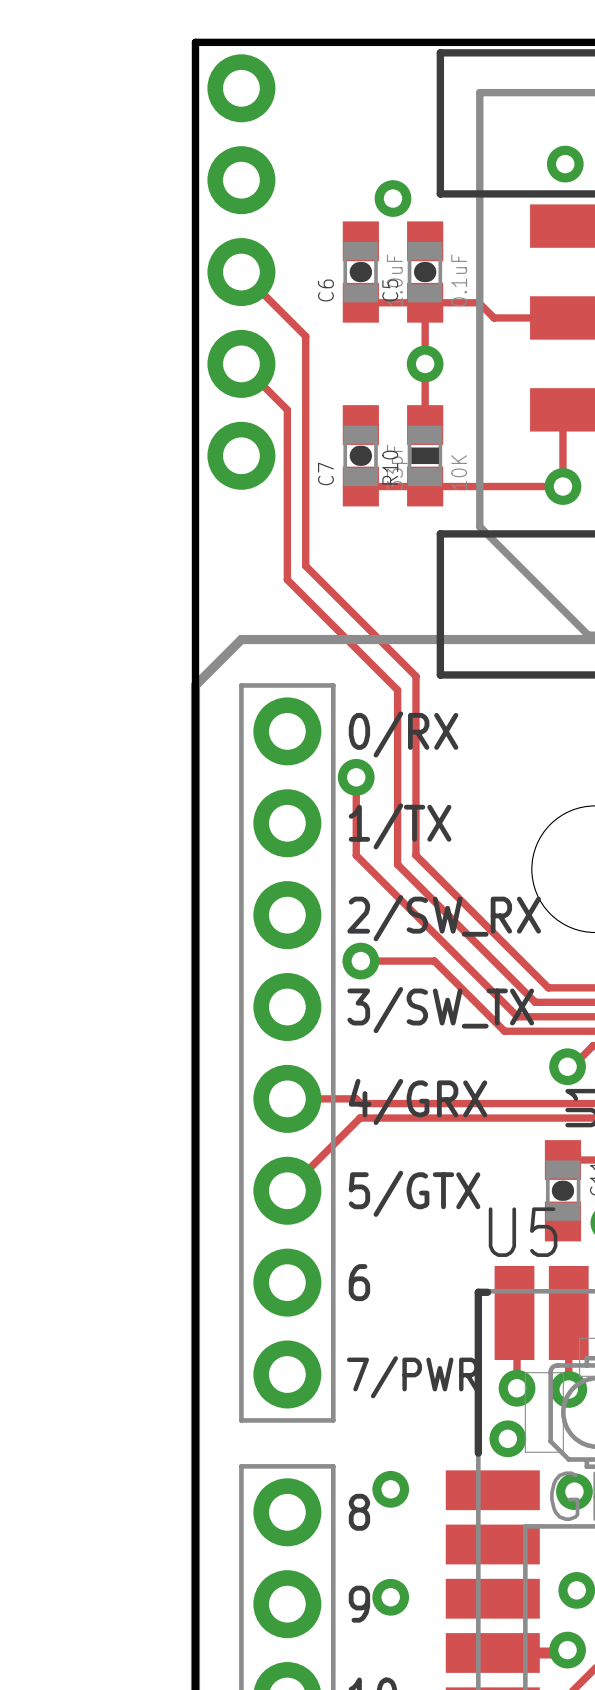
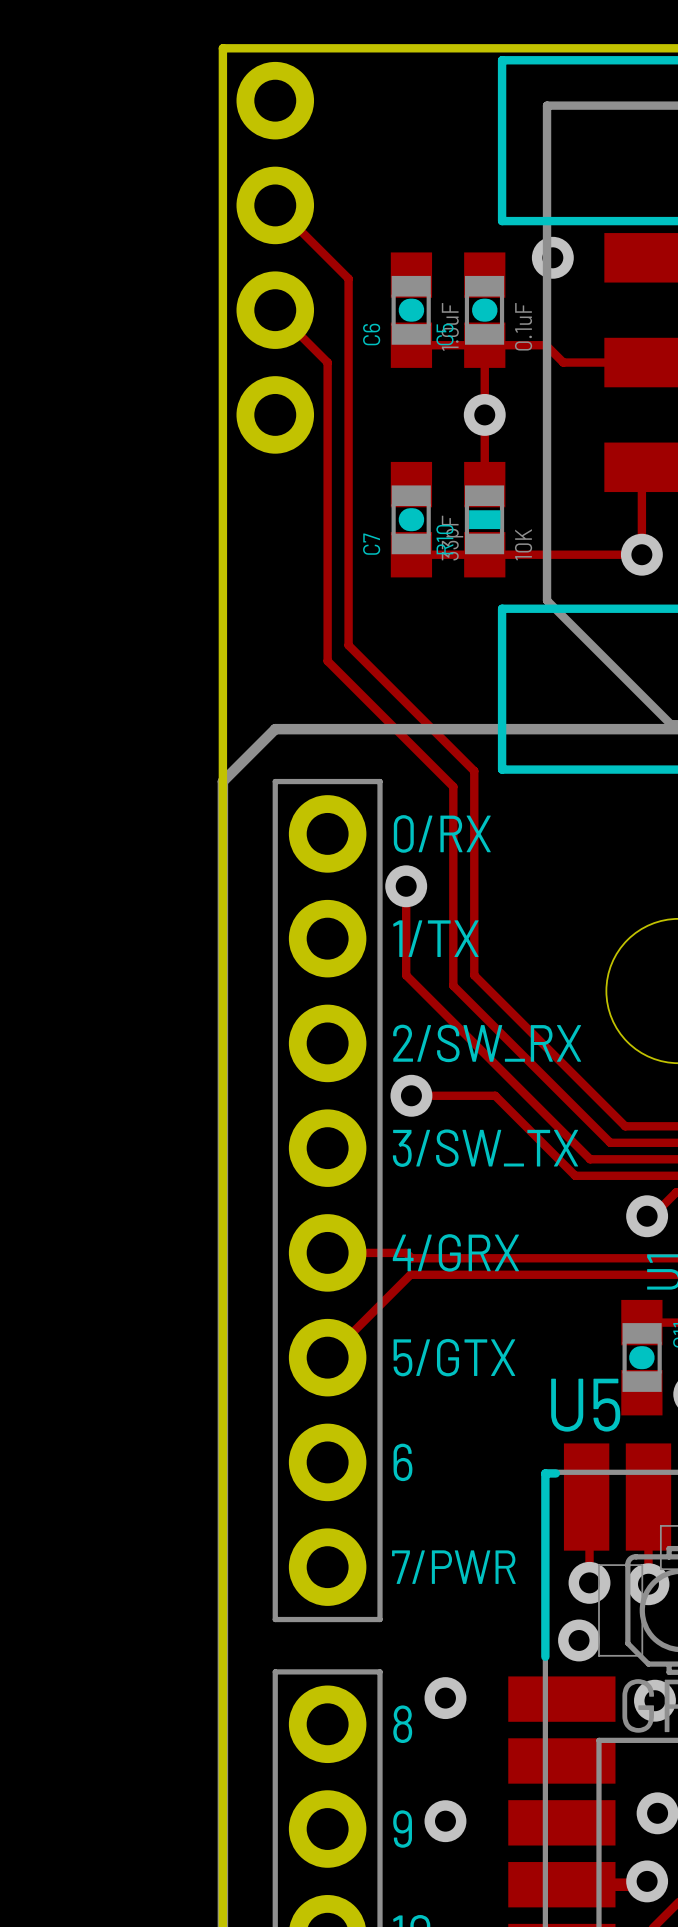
via: (565, 164) -> none
via: (393, 198) -> none
via: none -> (552, 257)
part position: (241, 272) -> (275, 205)
track: (287, 317) (305, 336) -> (275, 205) (348, 278) (348, 383)
track: (241, 363) (287, 409) -> (327, 362) (327, 467)
part position: (241, 455) -> (275, 414)

